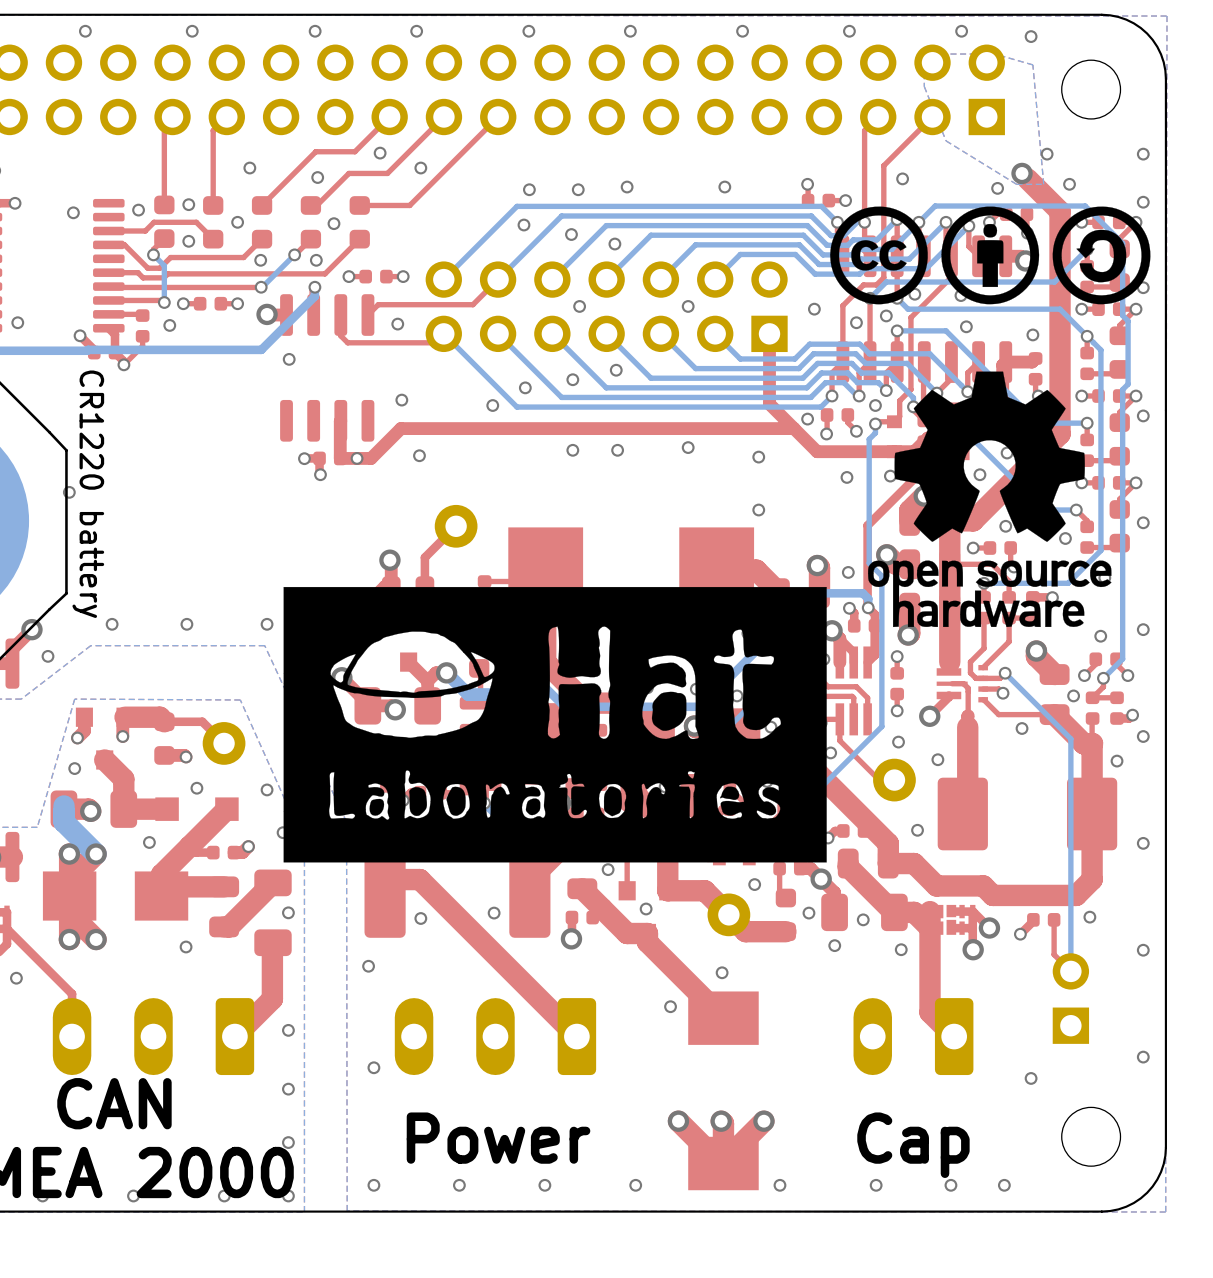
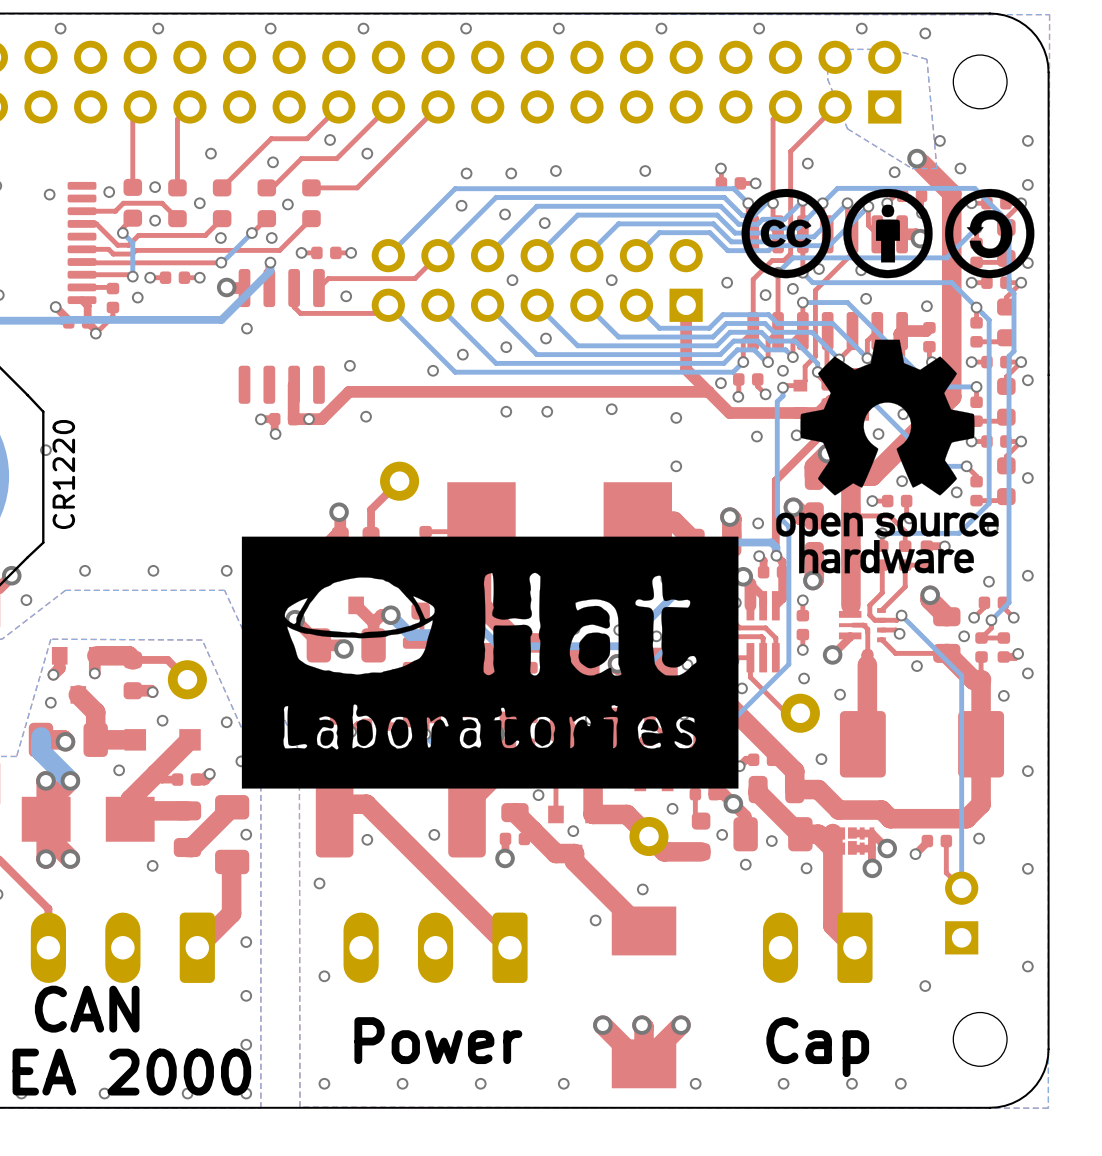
text: CR1220 battery (88, 494) -> none
text: none -> CR1220 (63, 474)

